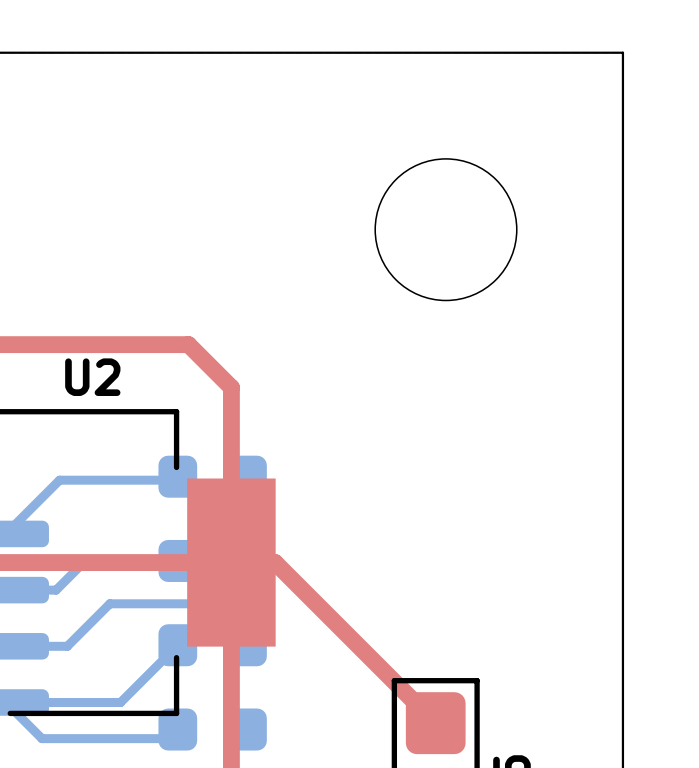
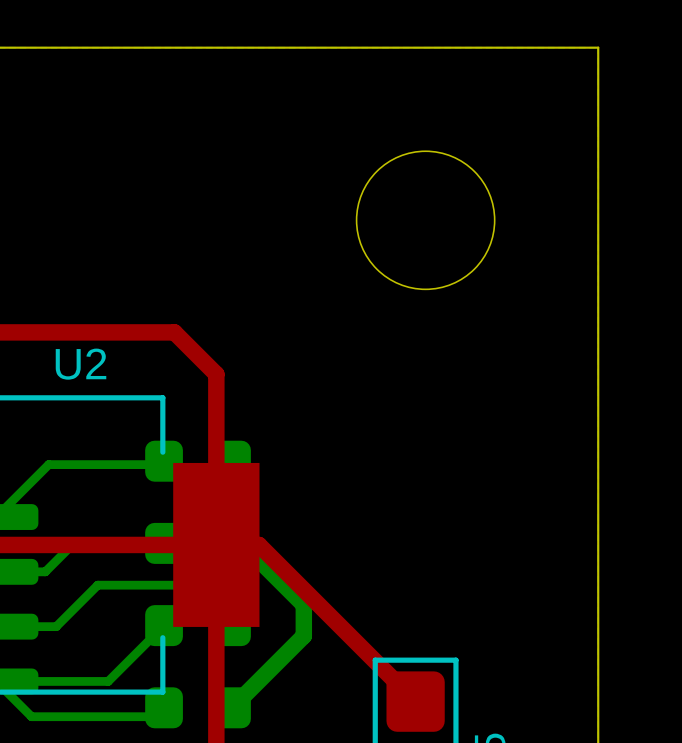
bottom track: none -> (232, 461) (232, 543) (242, 543) (303, 604) (303, 636) (232, 707)

